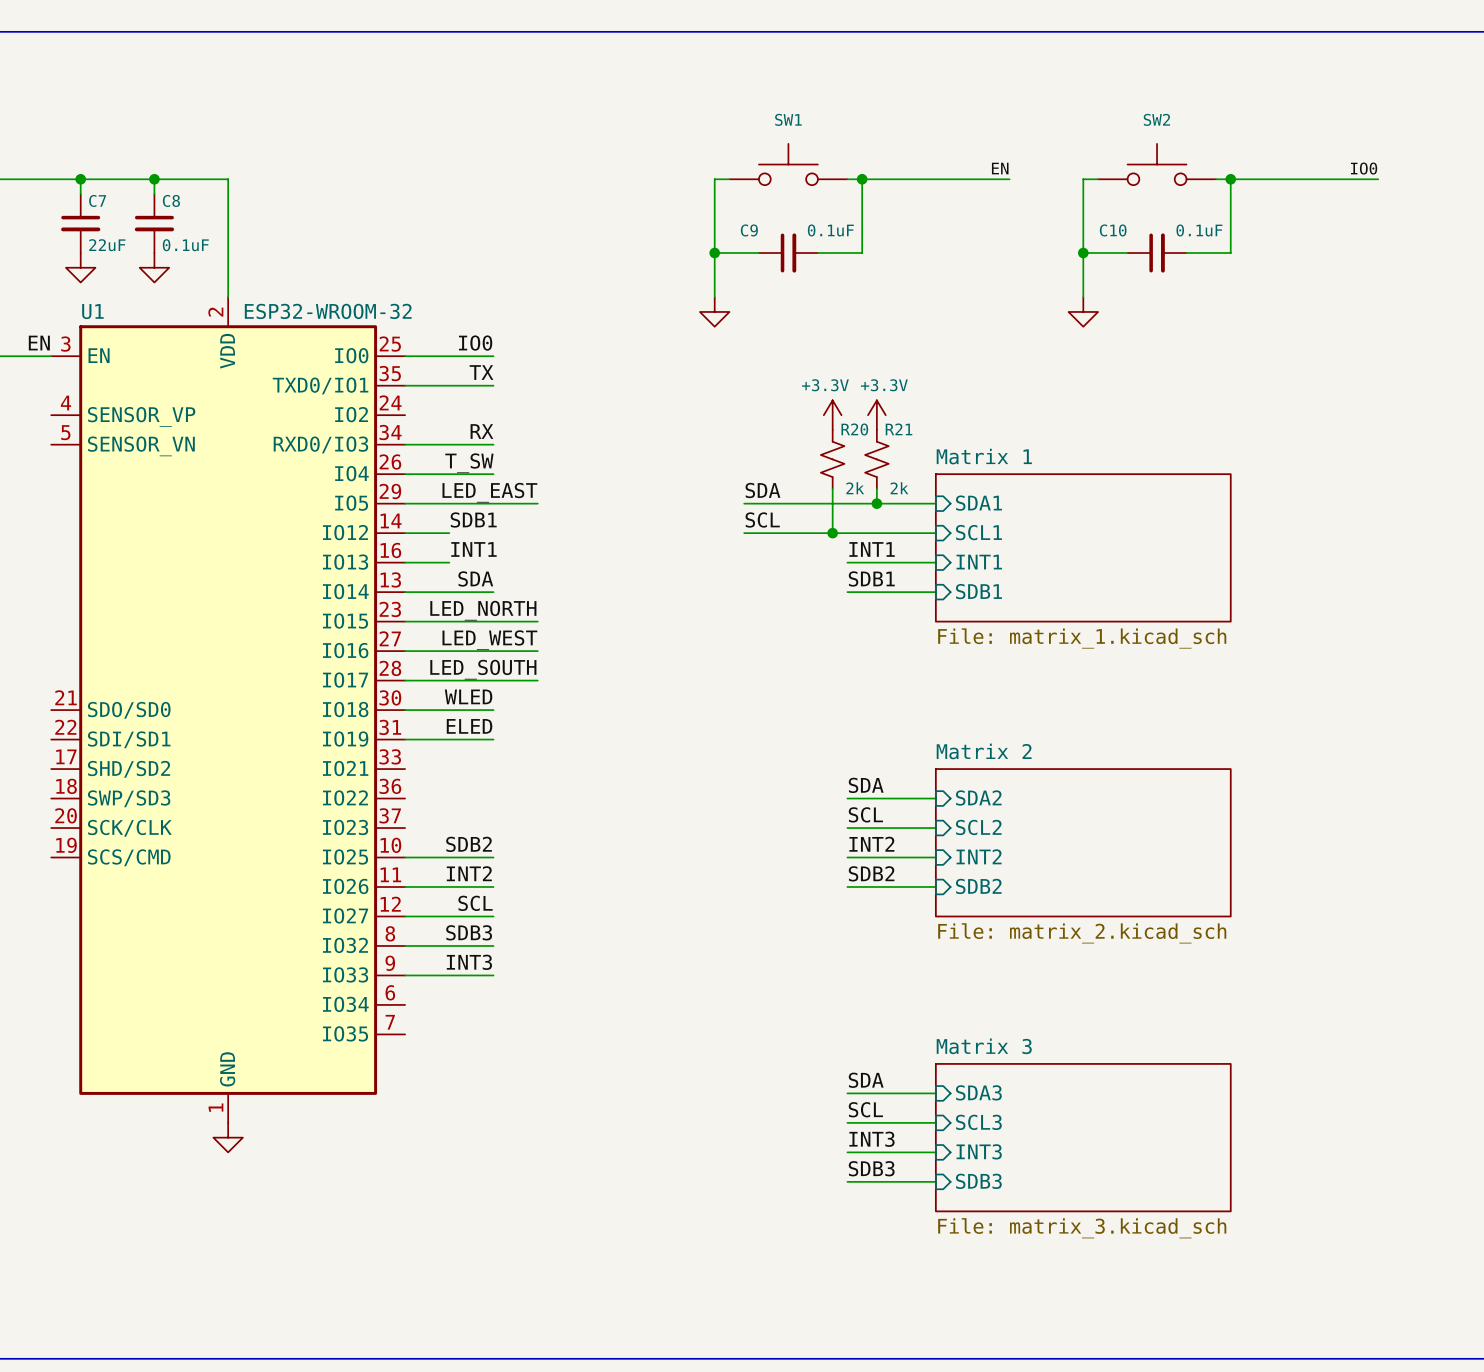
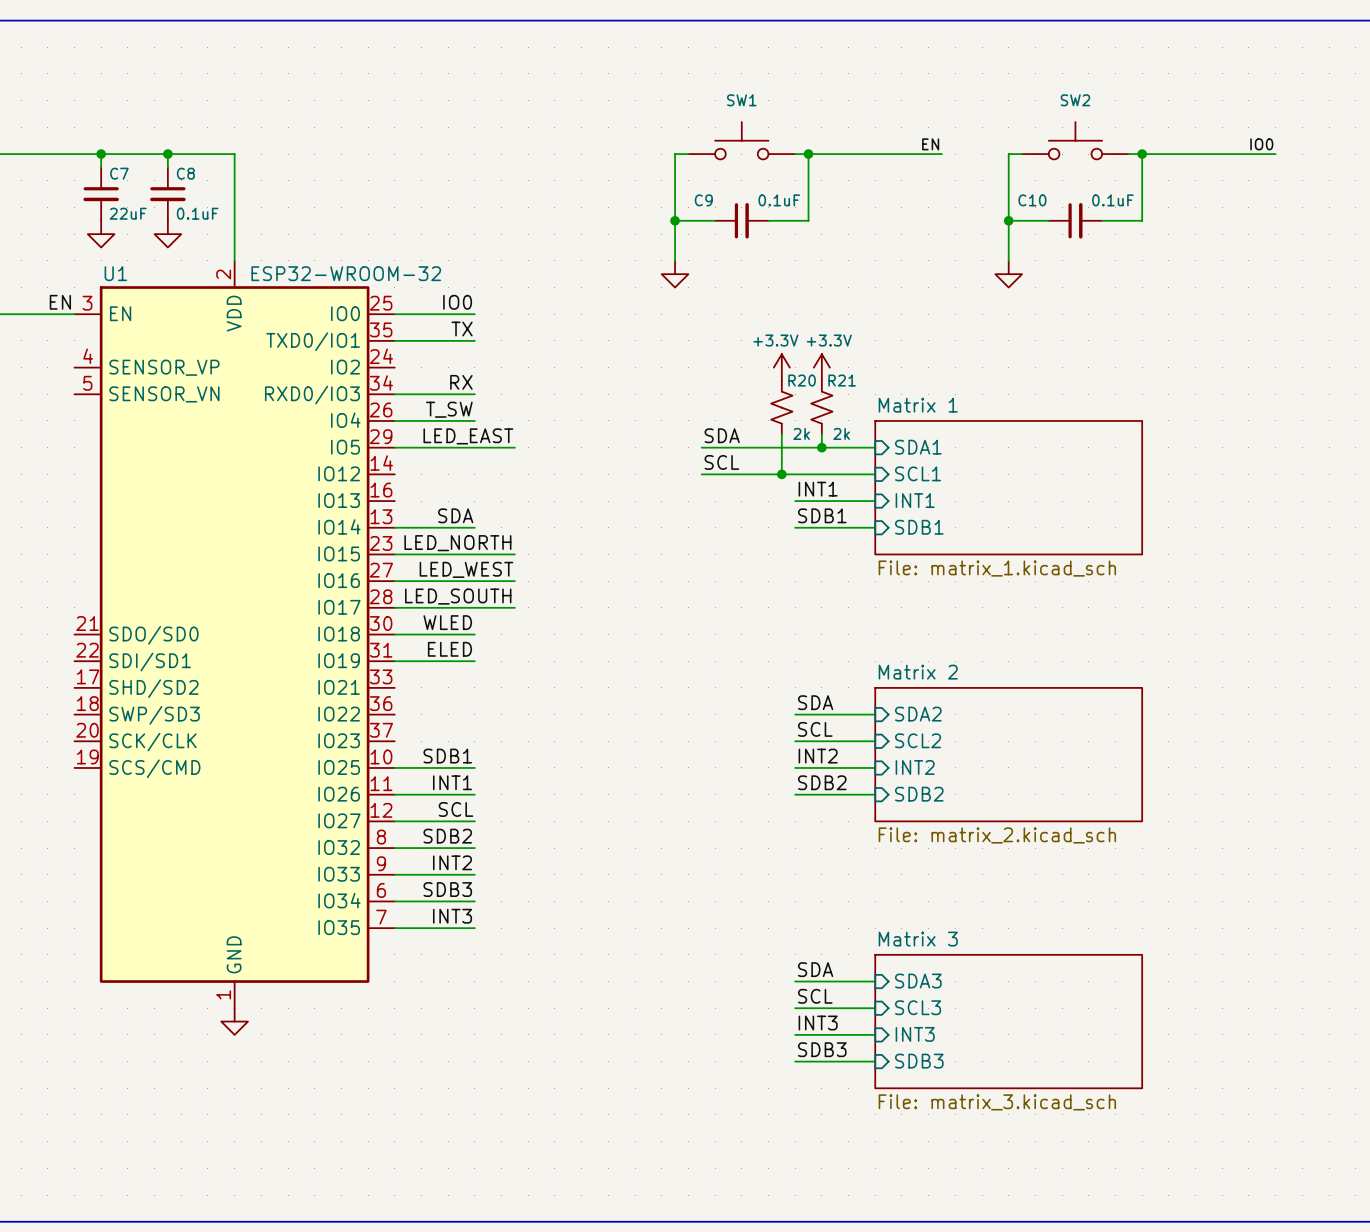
label: SDB1 (473, 519) -> none
wire: (405, 533) (449, 533) -> none
label: INT1 (473, 549) -> none
wire: (405, 562) (449, 562) -> none
label: SDB2 (469, 844) -> SDB1 (447, 756)
label: INT2 (469, 873) -> INT1 (452, 782)
label: SDB3 (469, 932) -> SDB2 (447, 836)
label: INT3 (469, 962) -> INT2 (452, 862)
label: none -> SDB3 (447, 889)
wire: none -> (394, 901) (474, 901)
label: none -> INT3 (452, 916)
wire: none -> (394, 928) (474, 928)

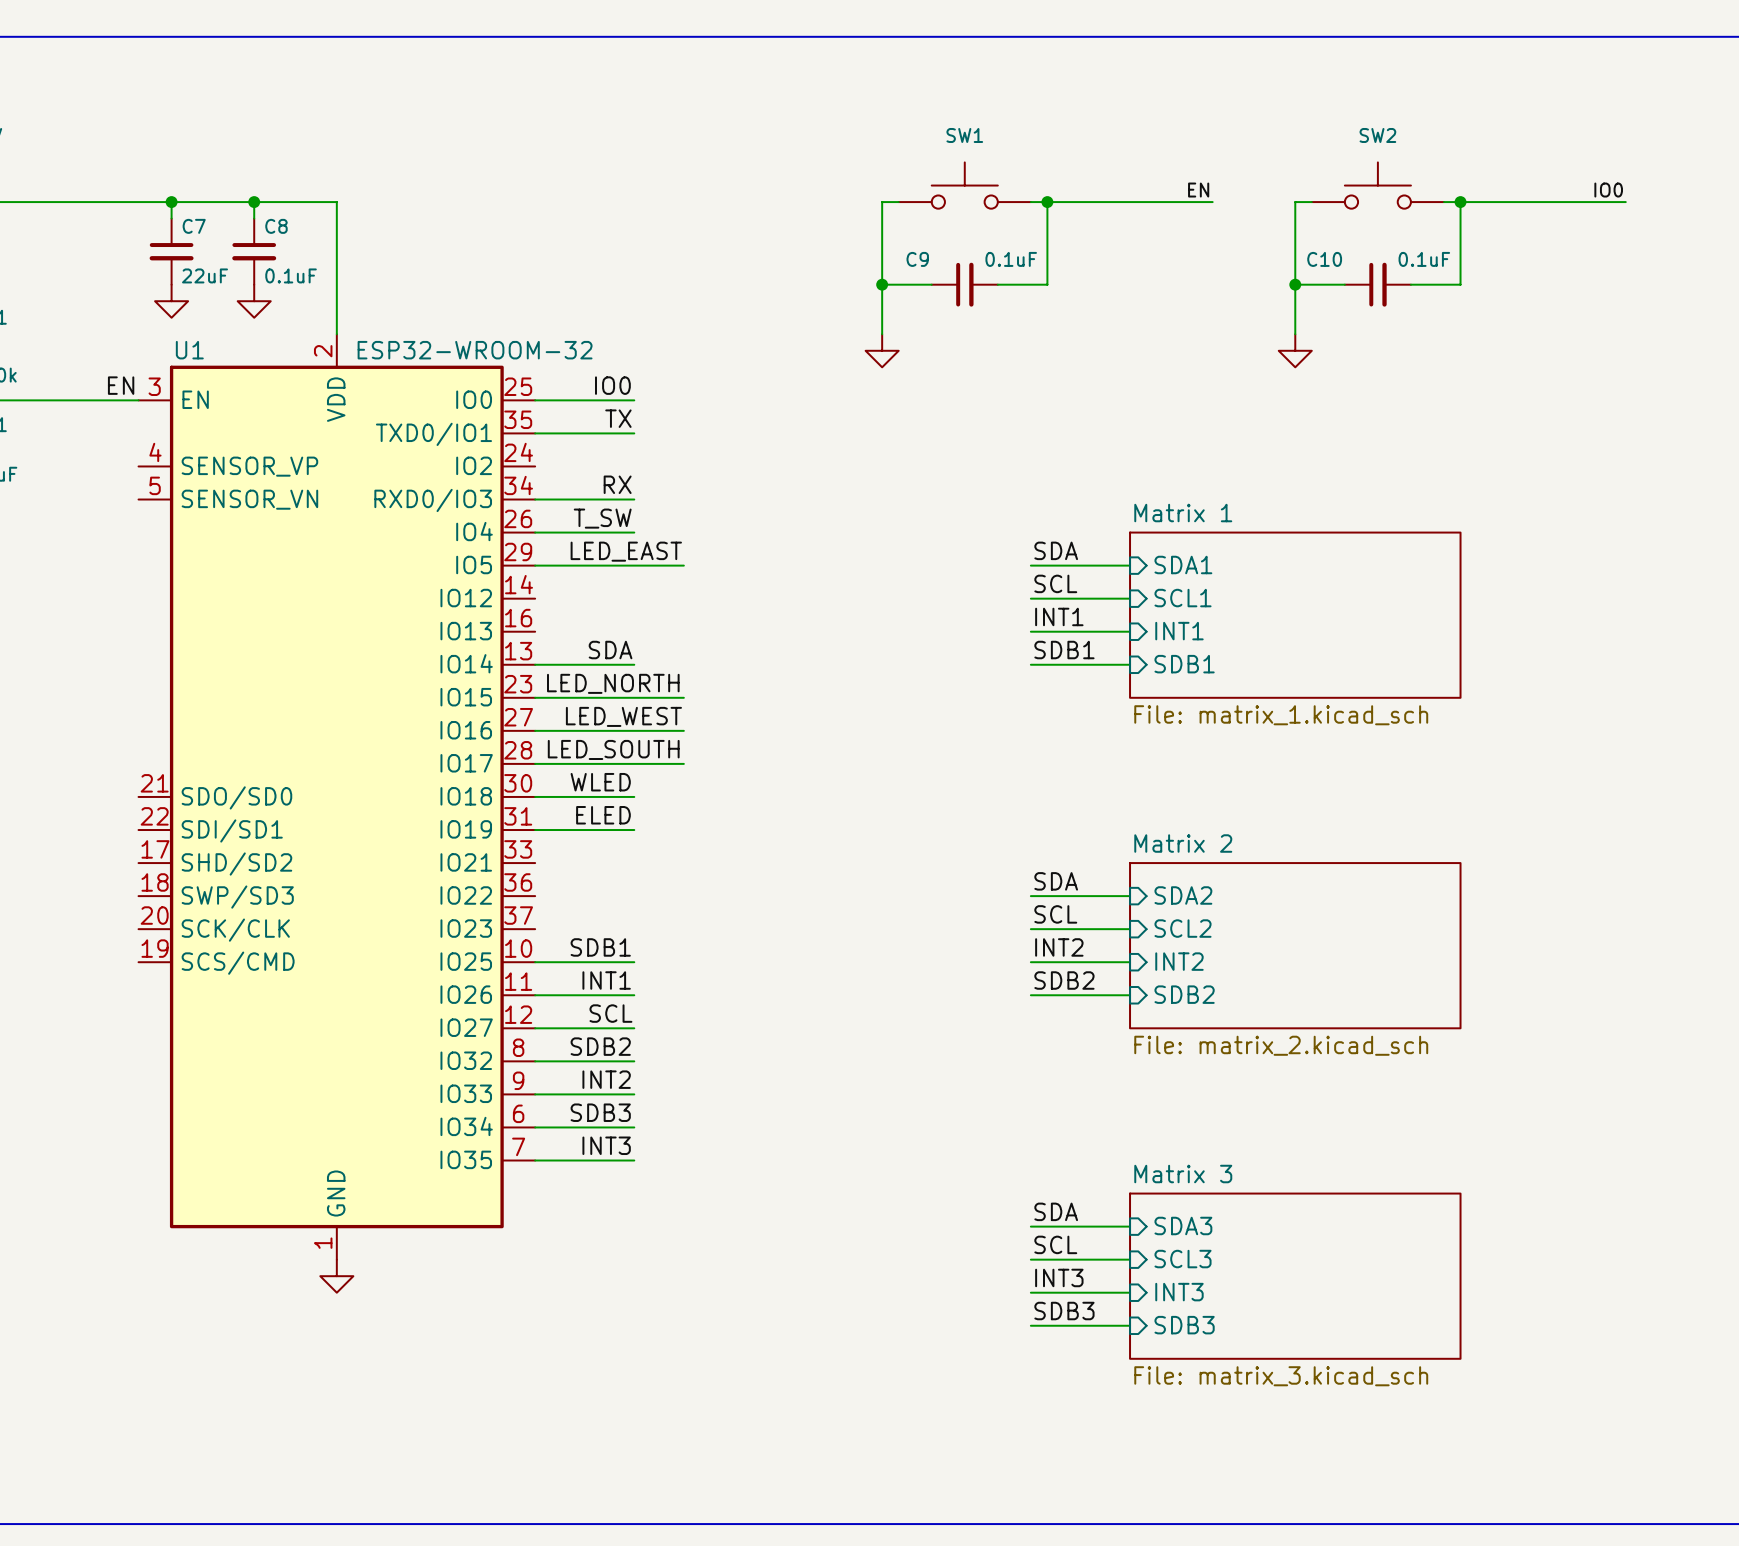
power symbol: +3.3V (781, 367) -> none
power symbol: +3.3V (821, 367) -> none
R20: 2k (781, 407) -> none
R21: 2k (821, 407) -> none
wire: (781, 434) (781, 474) -> none
wire: (821, 434) (821, 447) -> none
label position: SDA (722, 435) -> SDA (1056, 550)
wire: (701, 447) (795, 447) -> none
junction: (821, 447) -> none
label position: SCL (721, 462) -> SCL (1055, 583)
wire: (701, 474) (795, 474) -> none
junction: (781, 474) -> none

